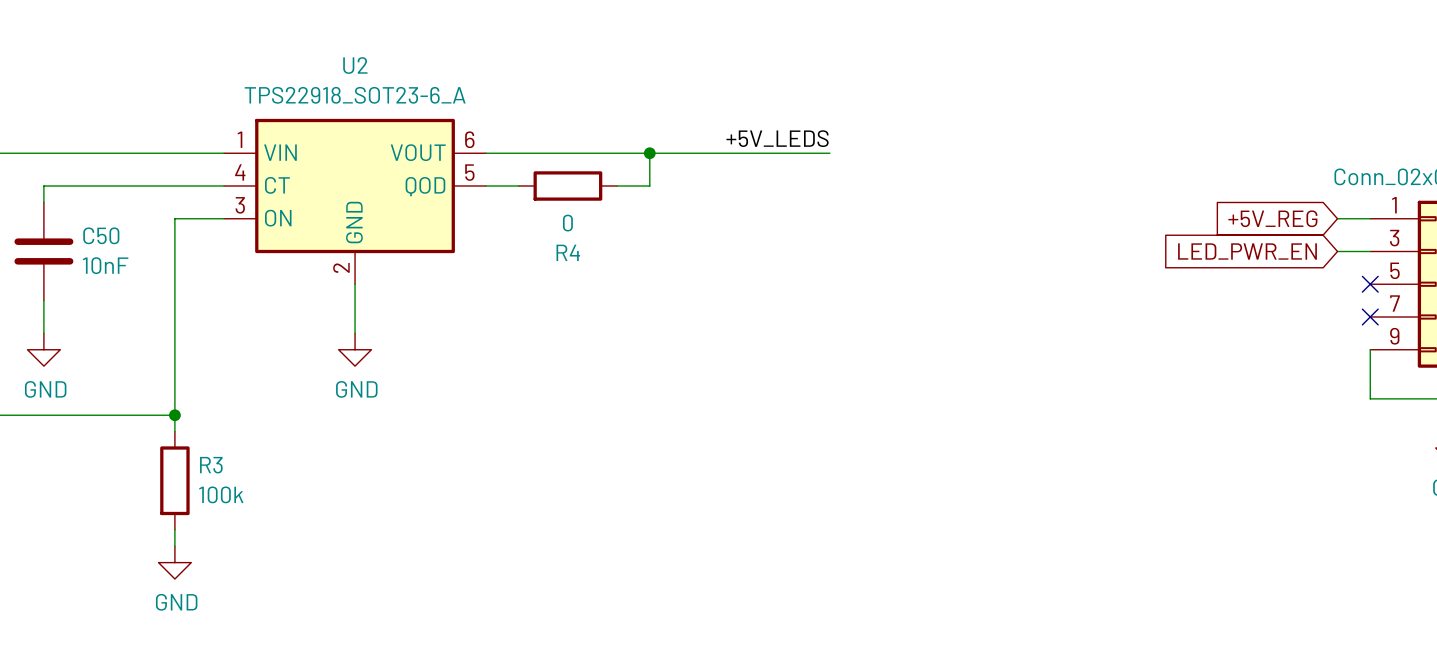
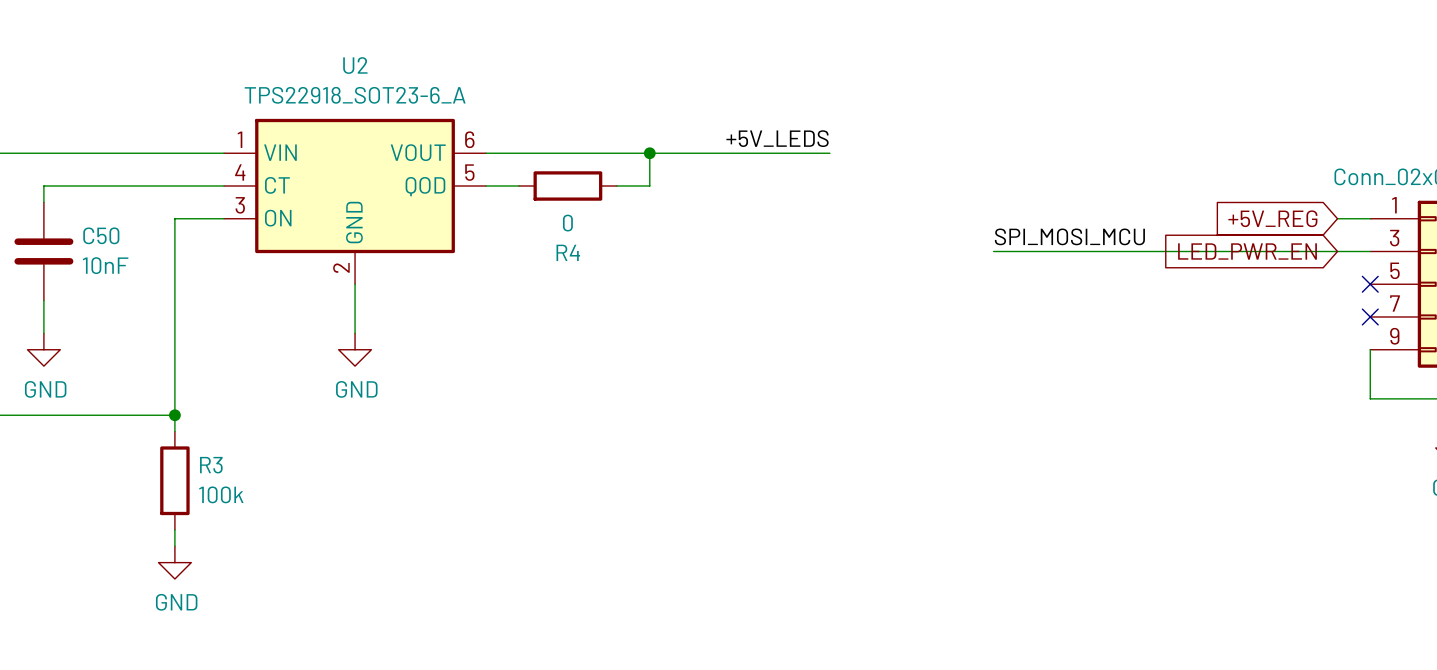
label: none -> SPI_MOSI_MCU (1069, 236)
wire: none -> (993, 251) (1337, 251)

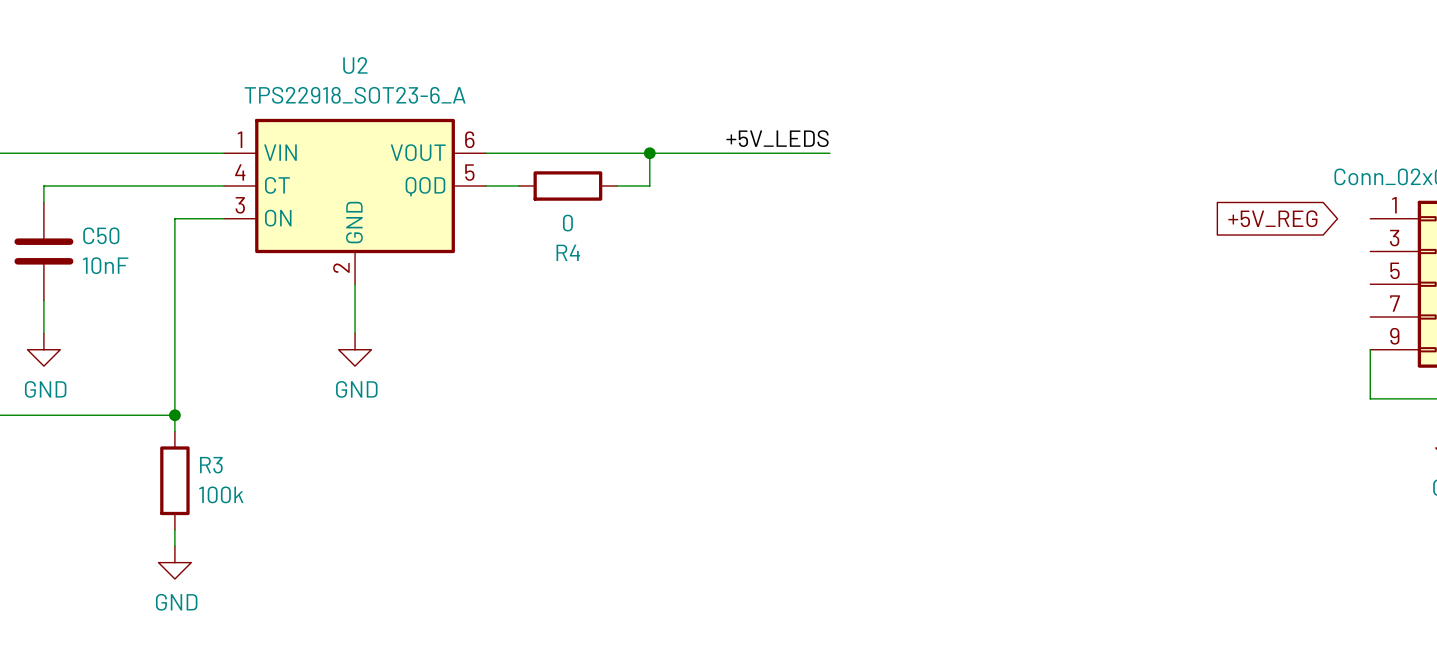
wire: (1337, 218) (1370, 218) -> none
label: SPI_MOSI_MCU (1069, 236) -> none
wire: (993, 251) (1370, 251) -> none
global label: LED_PWR_EN (1247, 251) -> none
no-connect mark: (1370, 284) -> none
no-connect mark: (1370, 317) -> none

